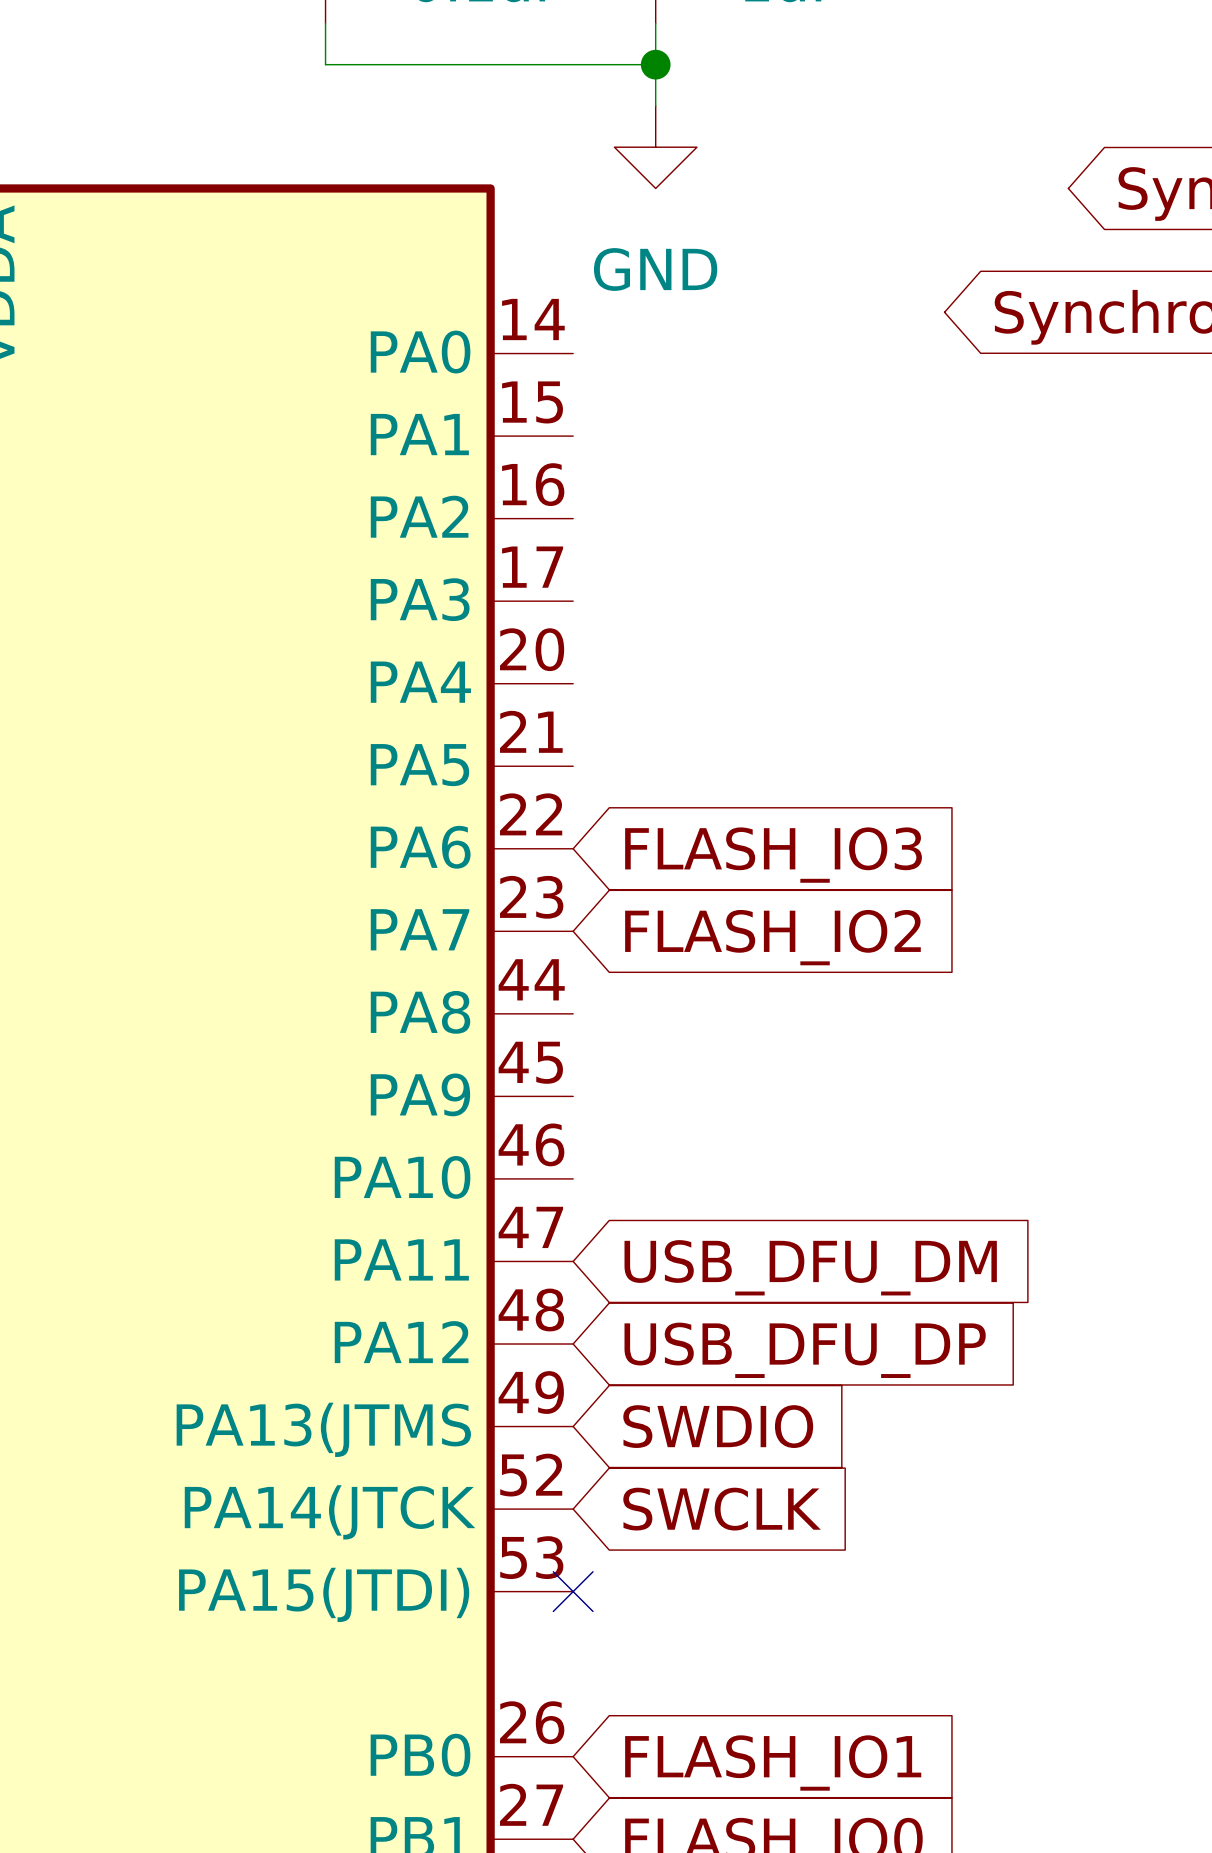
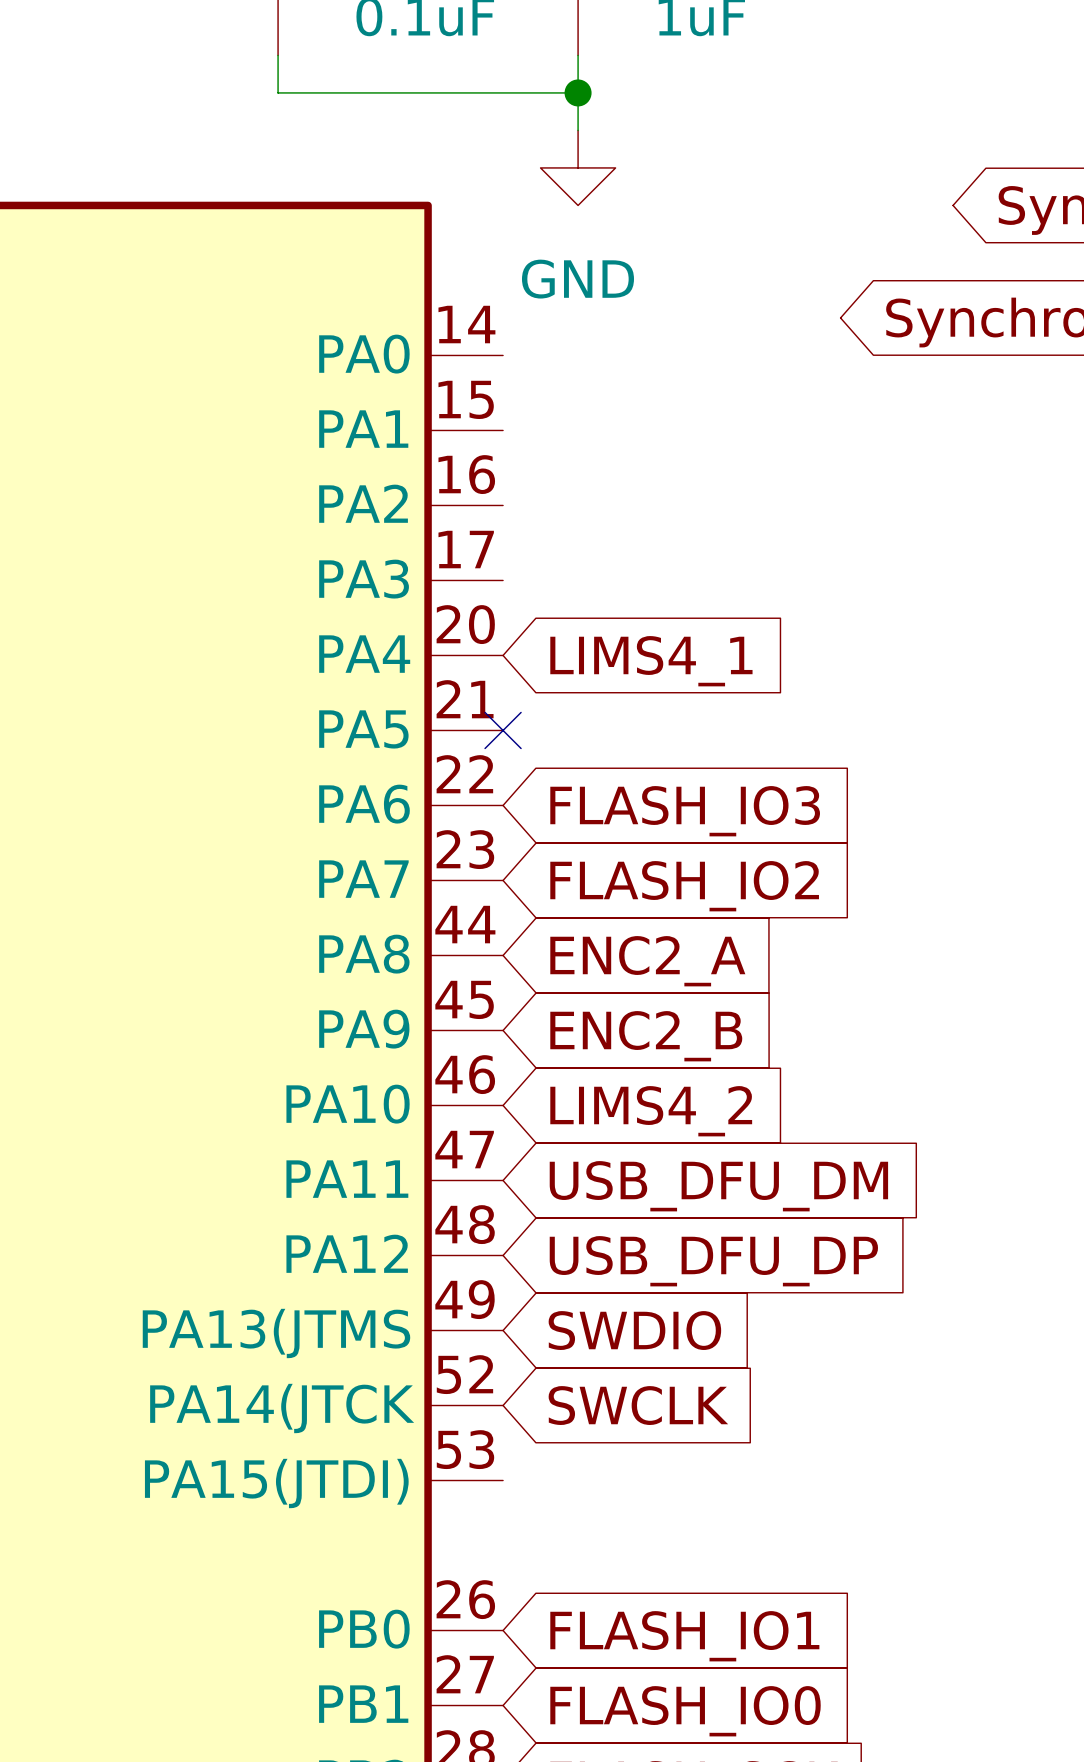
global label: none -> LIMS4_1 (651, 661)
no-connect mark: none -> (503, 730)
global label: none -> ENC2_A (647, 961)
global label: none -> ENC2_B (646, 1036)
global label: none -> LIMS4_2 (651, 1111)
no-connect mark: (573, 1591) -> none

